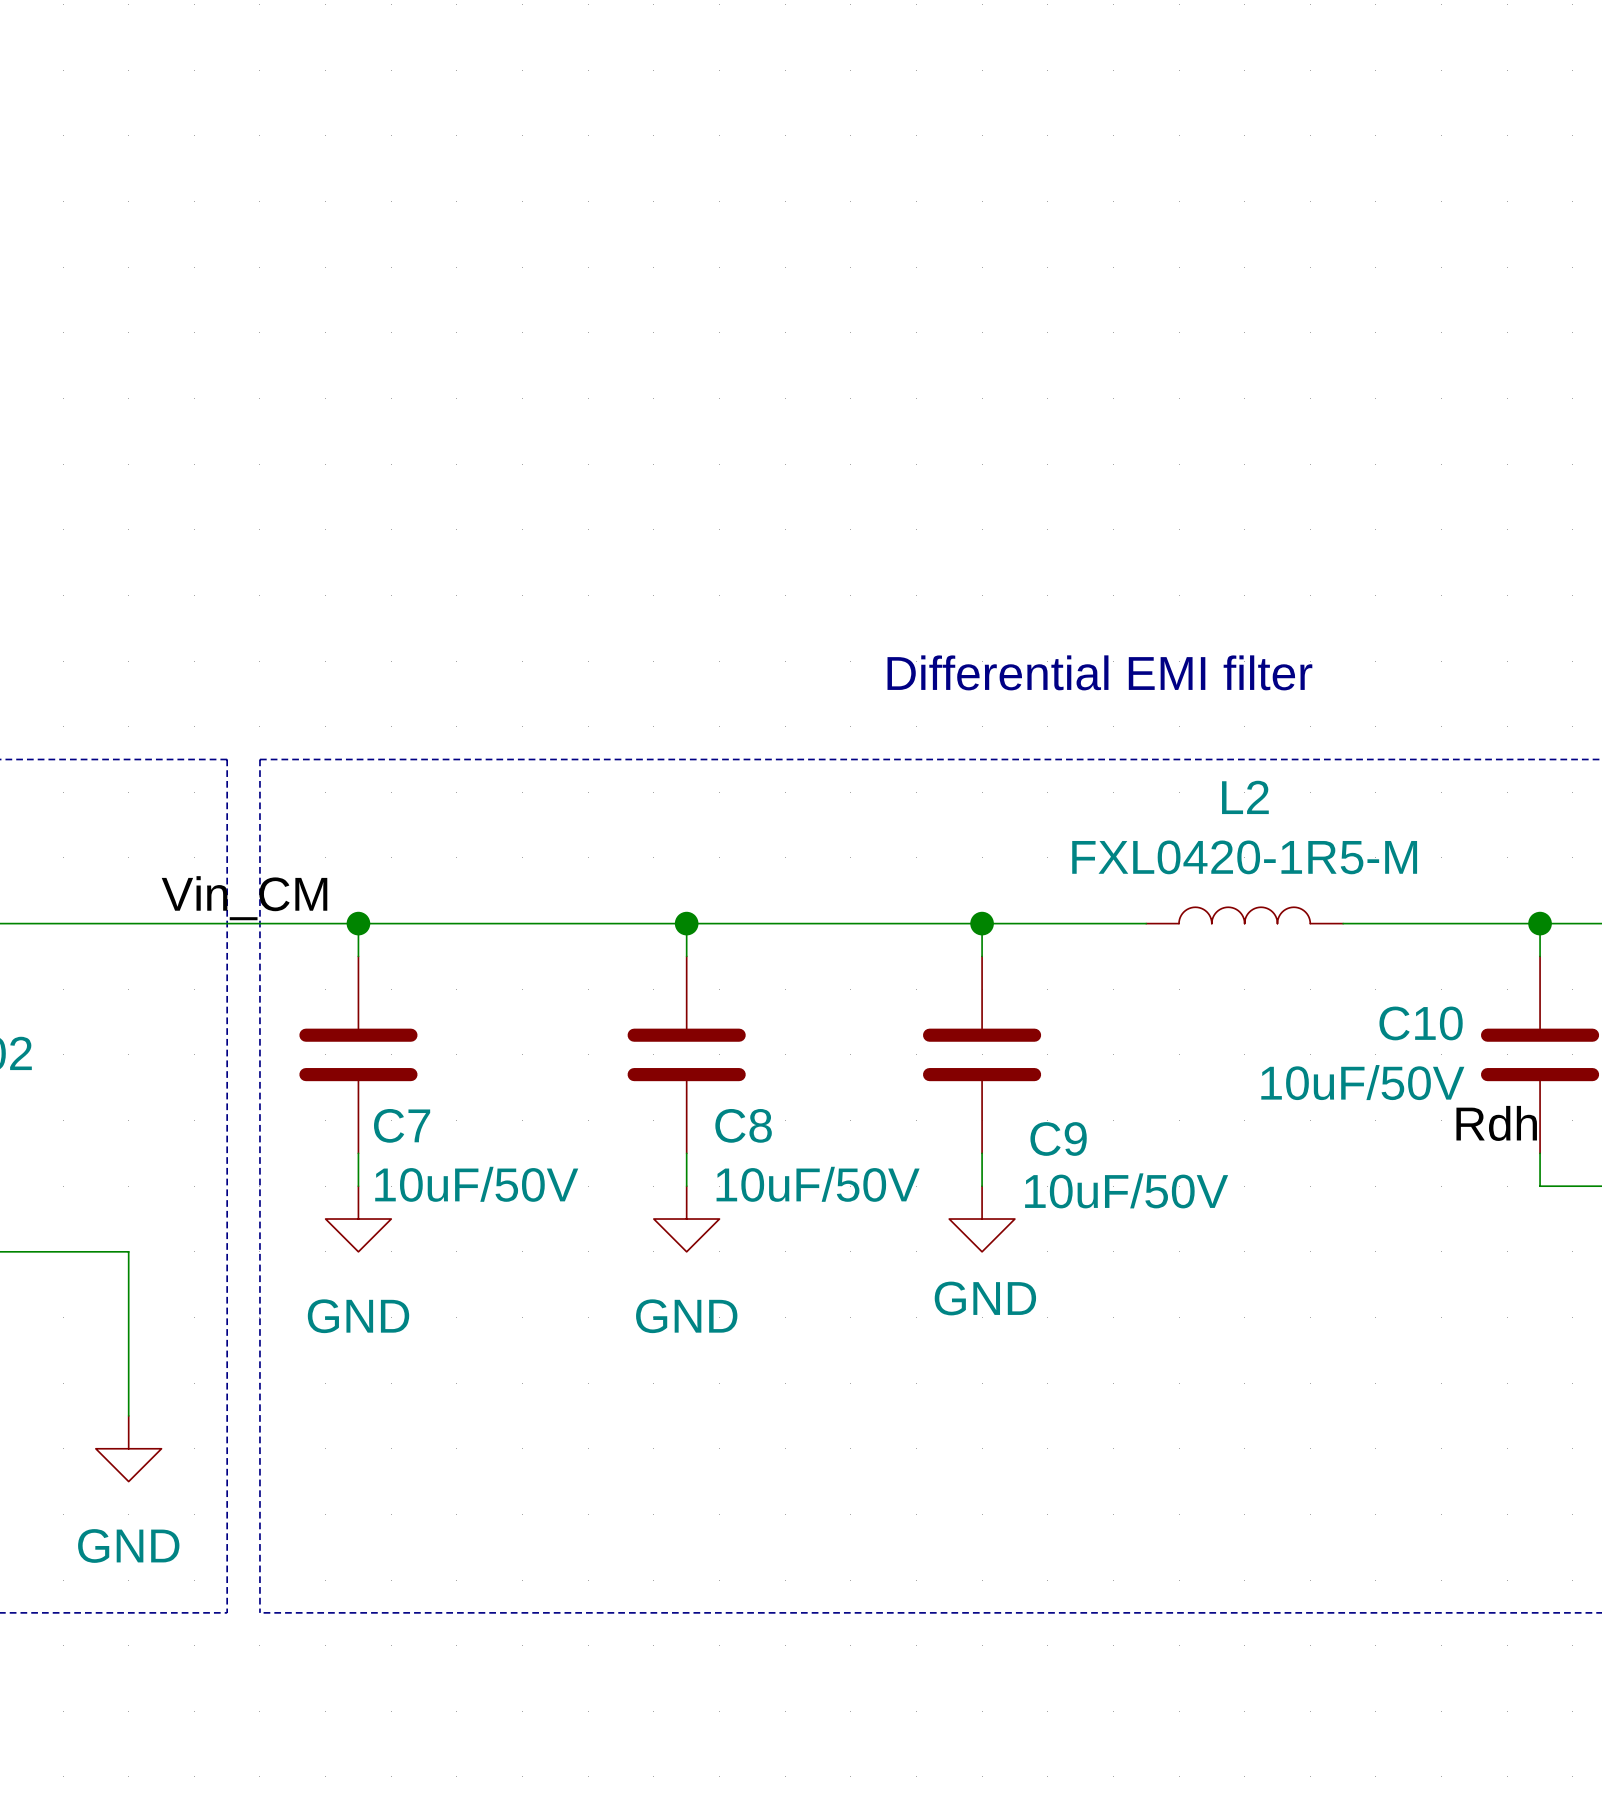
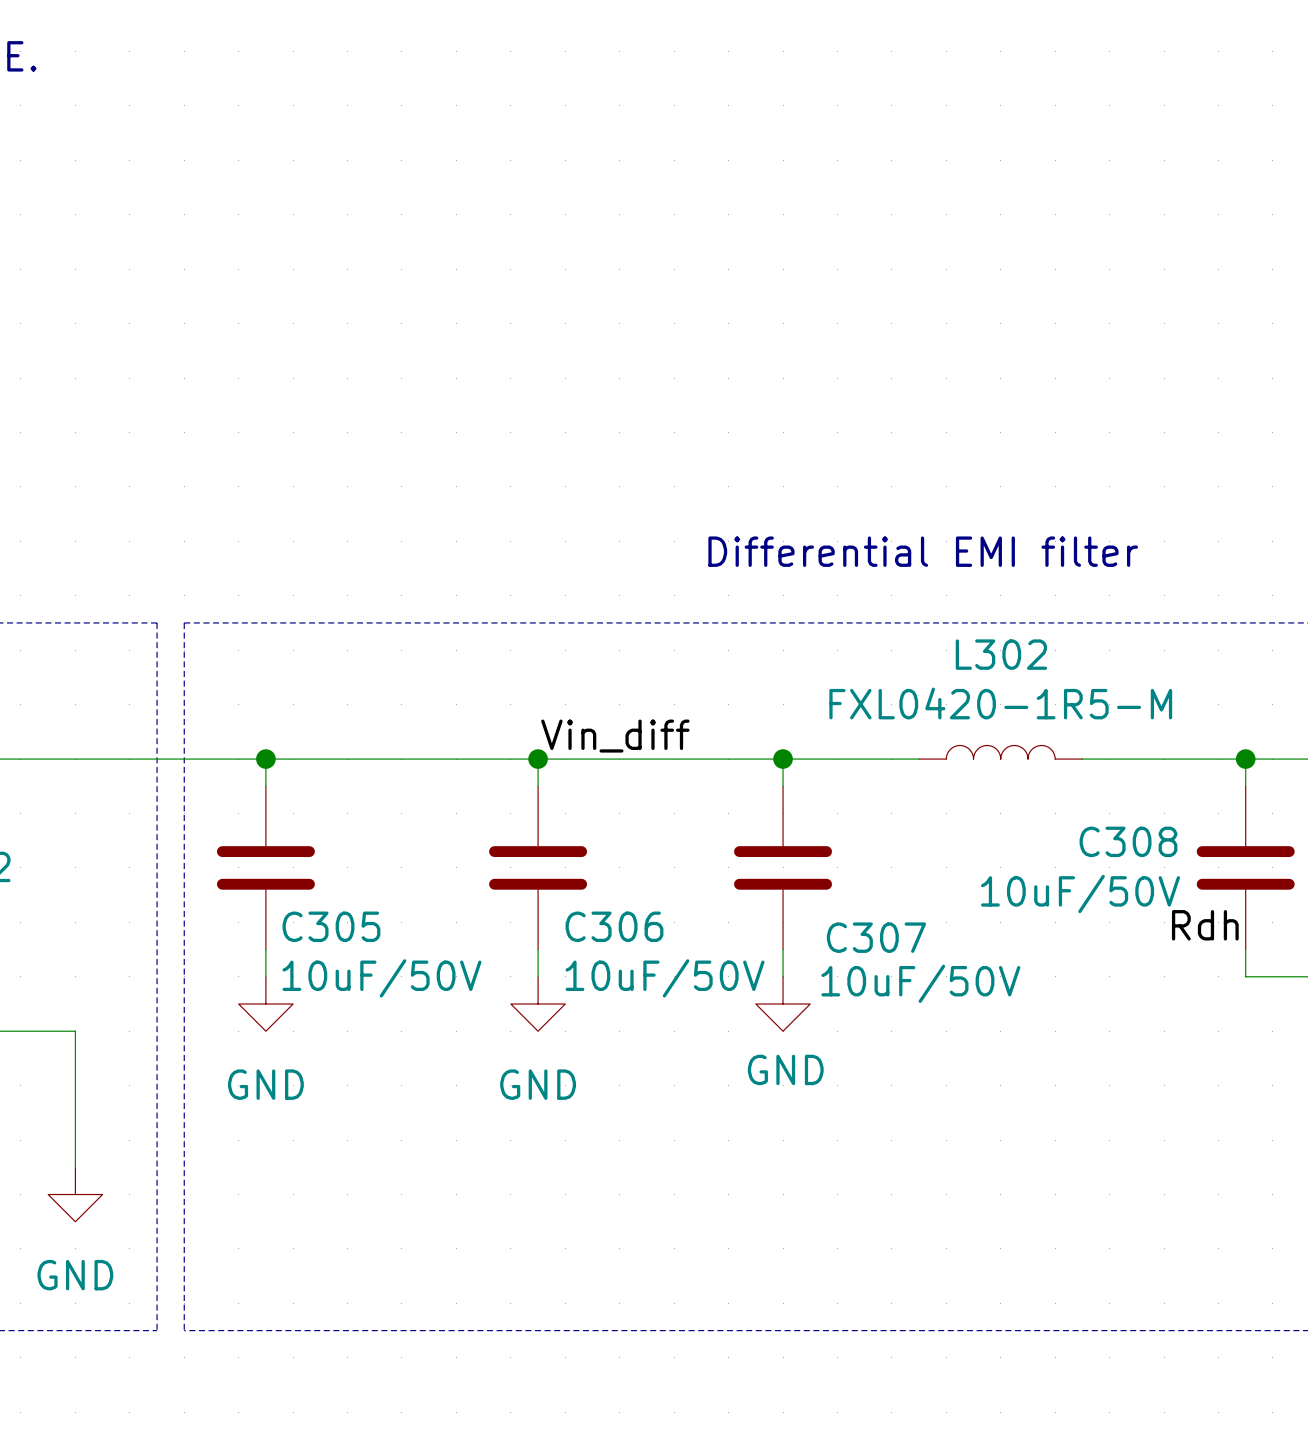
L2 name: L2 (1245, 797) -> L302 (1001, 654)
label: Vin_CM (244, 898) -> none
label: none -> Vin_diff (615, 736)
C10 name: C10 (1421, 1023) -> C308 (1128, 841)
C7 name: C7 (402, 1125) -> C305 (331, 926)
C8 name: C8 (743, 1125) -> C306 (614, 926)
C9 name: C9 (1058, 1138) -> C307 (876, 937)

